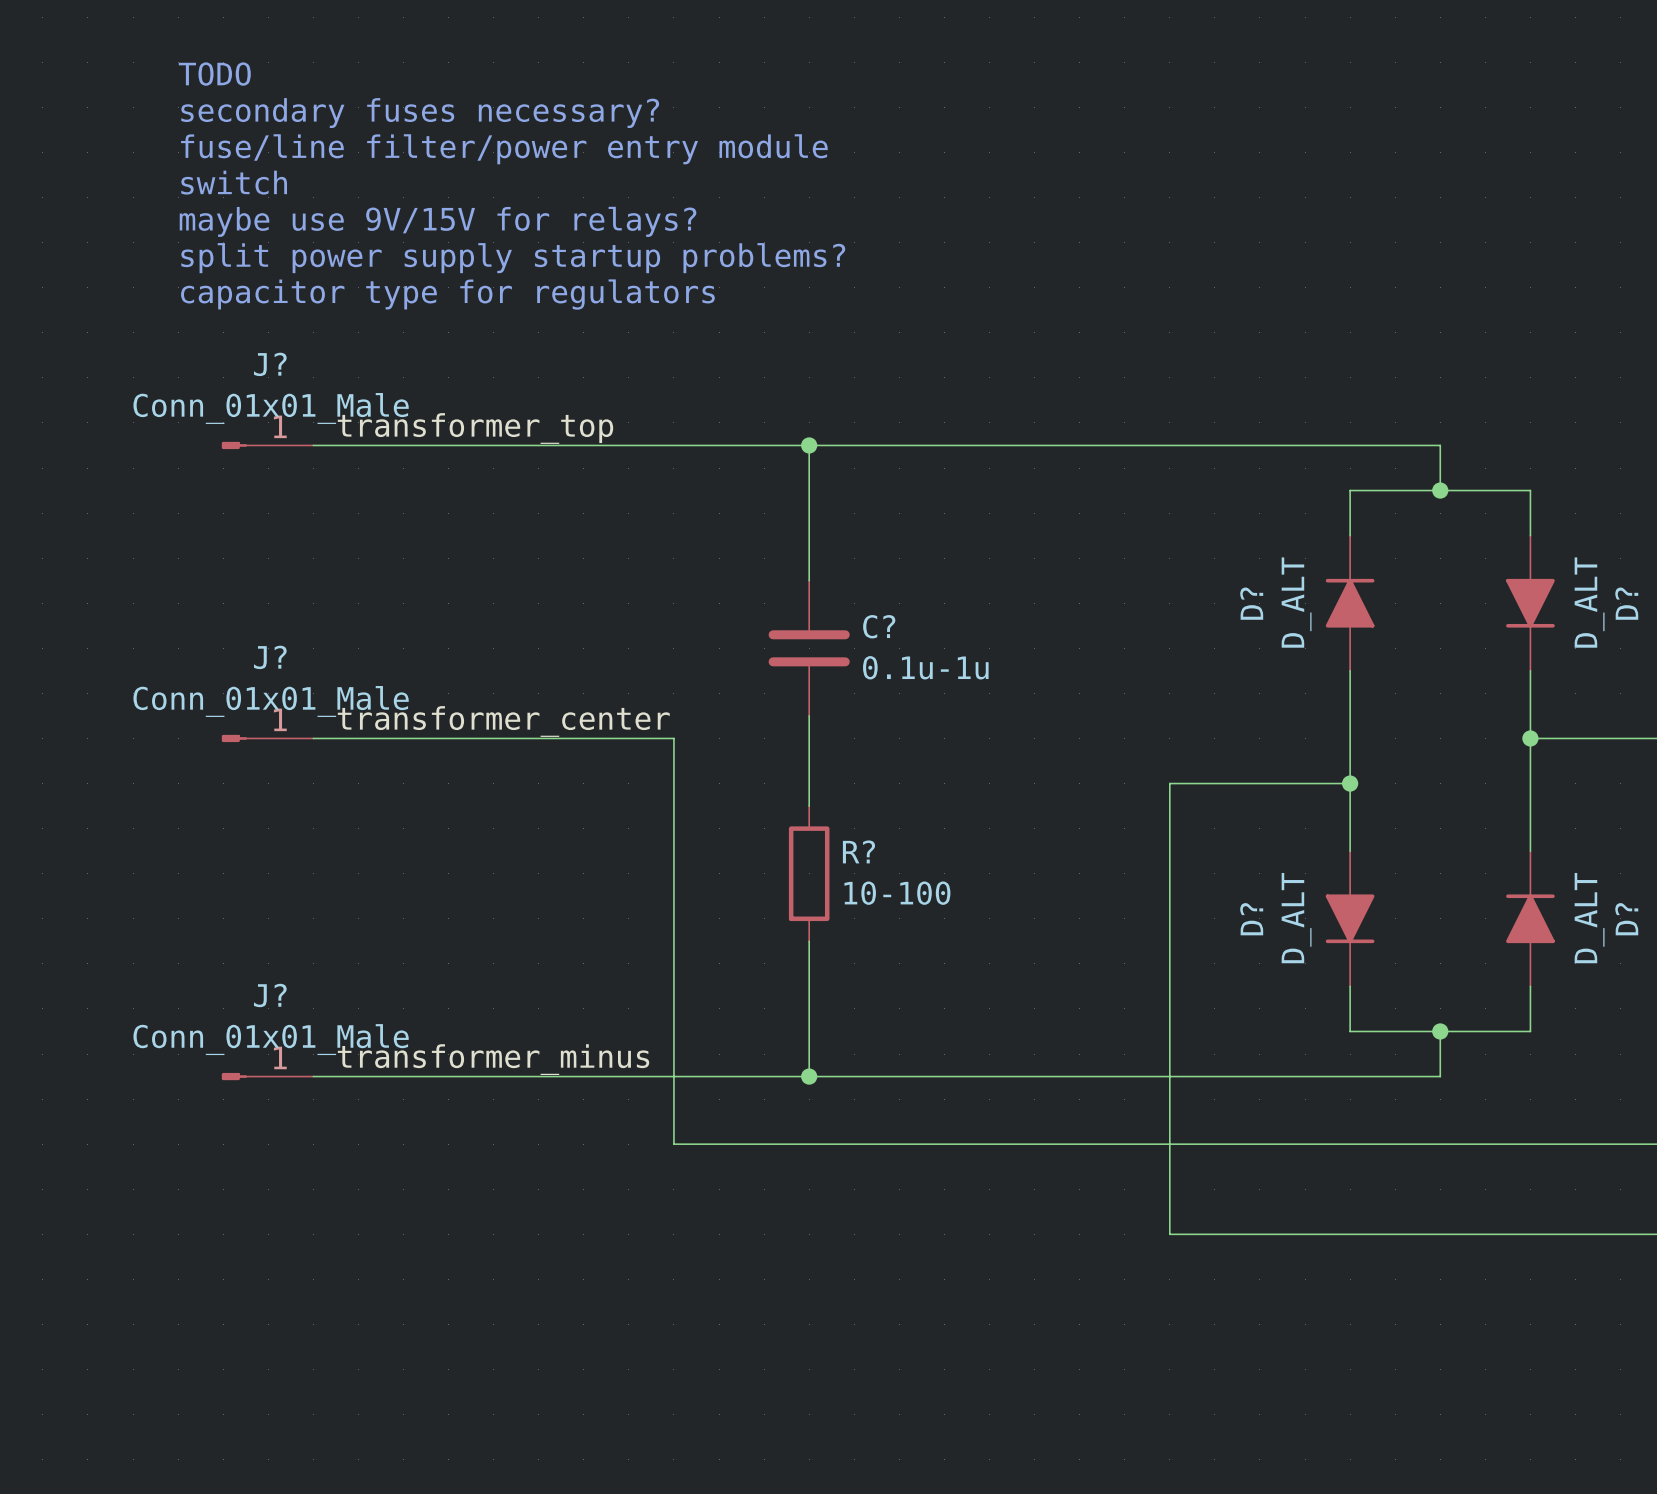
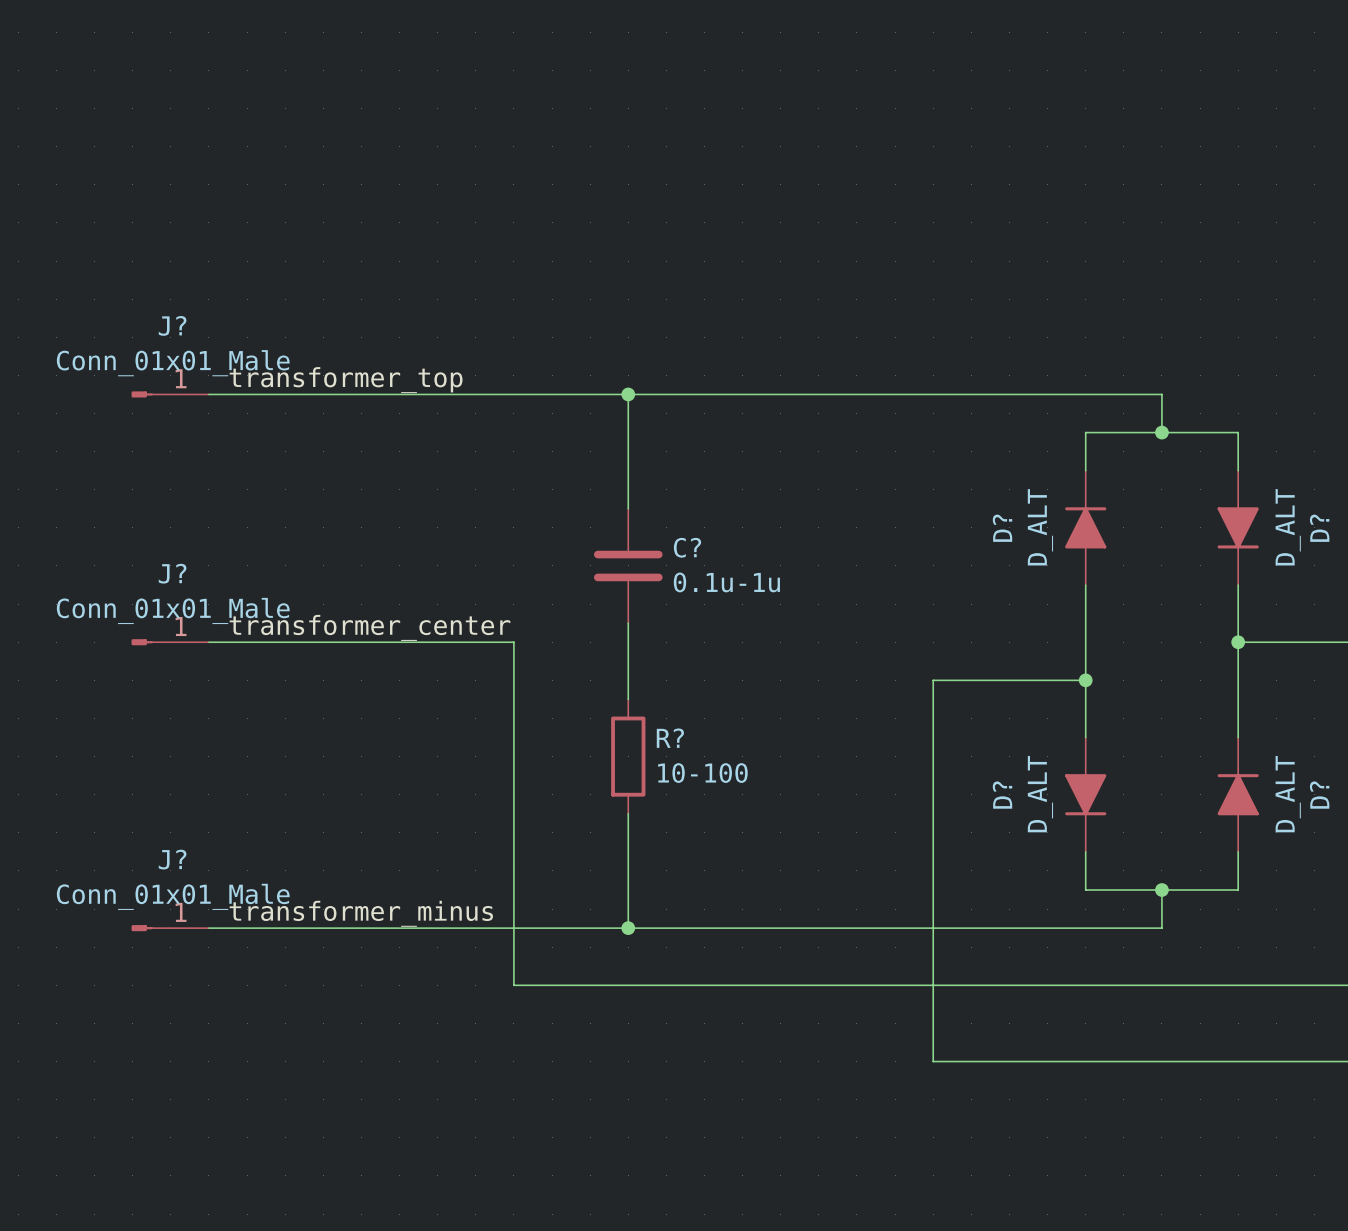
text: TODO (214, 74) -> none
text: secondary fuses necessary? (420, 113) -> none
text: fuse/line filter/power entry module (504, 149) -> none
text: switch (234, 182) -> none
text: maybe use 9V/15V for relays? (438, 221) -> none
text: split power supply startup problems? (513, 258) -> none
text: capacitor type for regulators (447, 294) -> none

